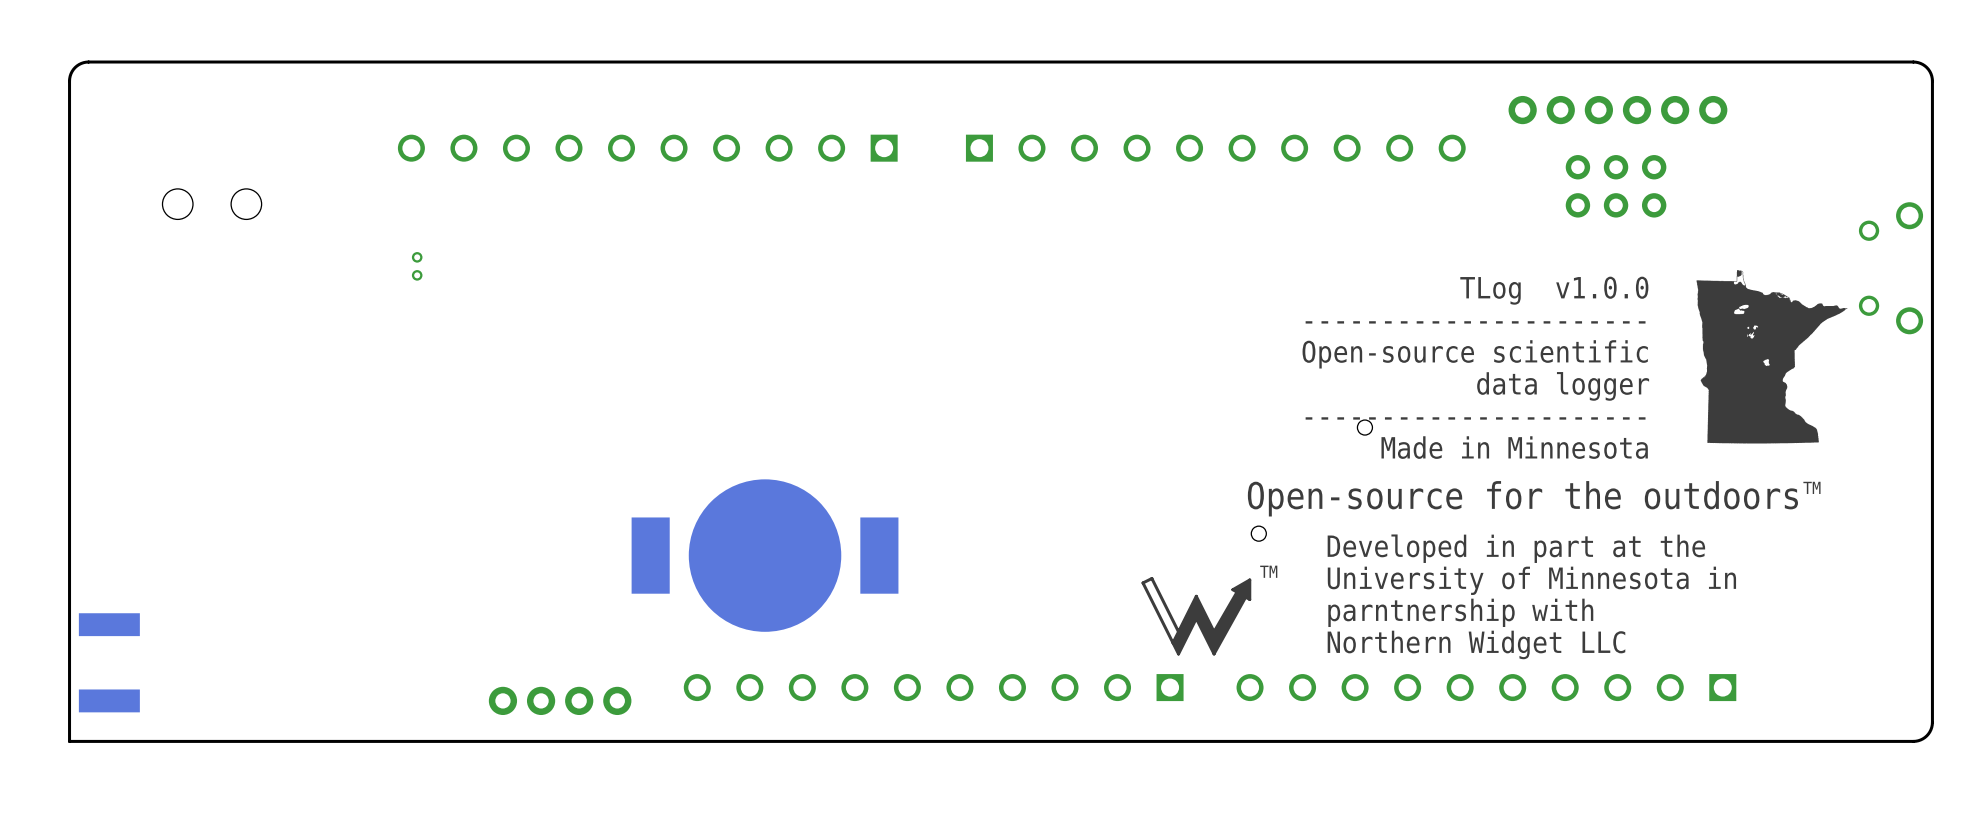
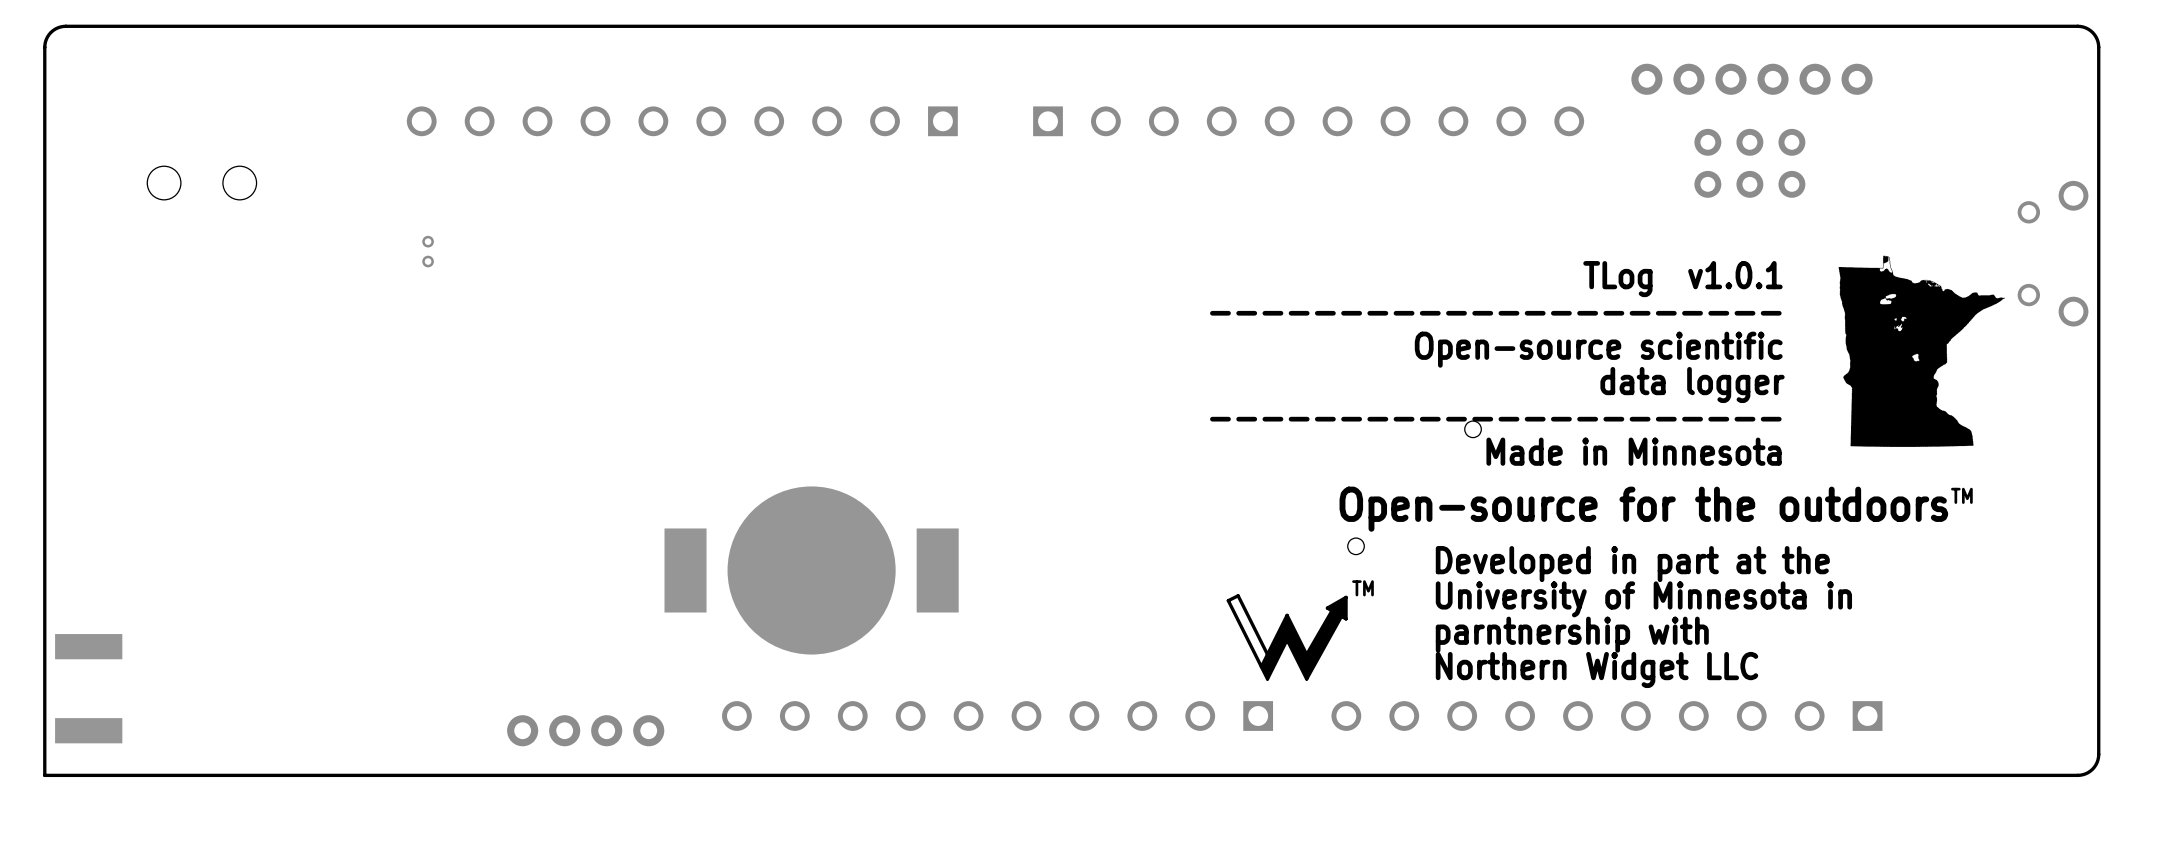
text: TLog v1.0.0 (1554, 290) -> TLog v1.0.1 (1682, 279)

